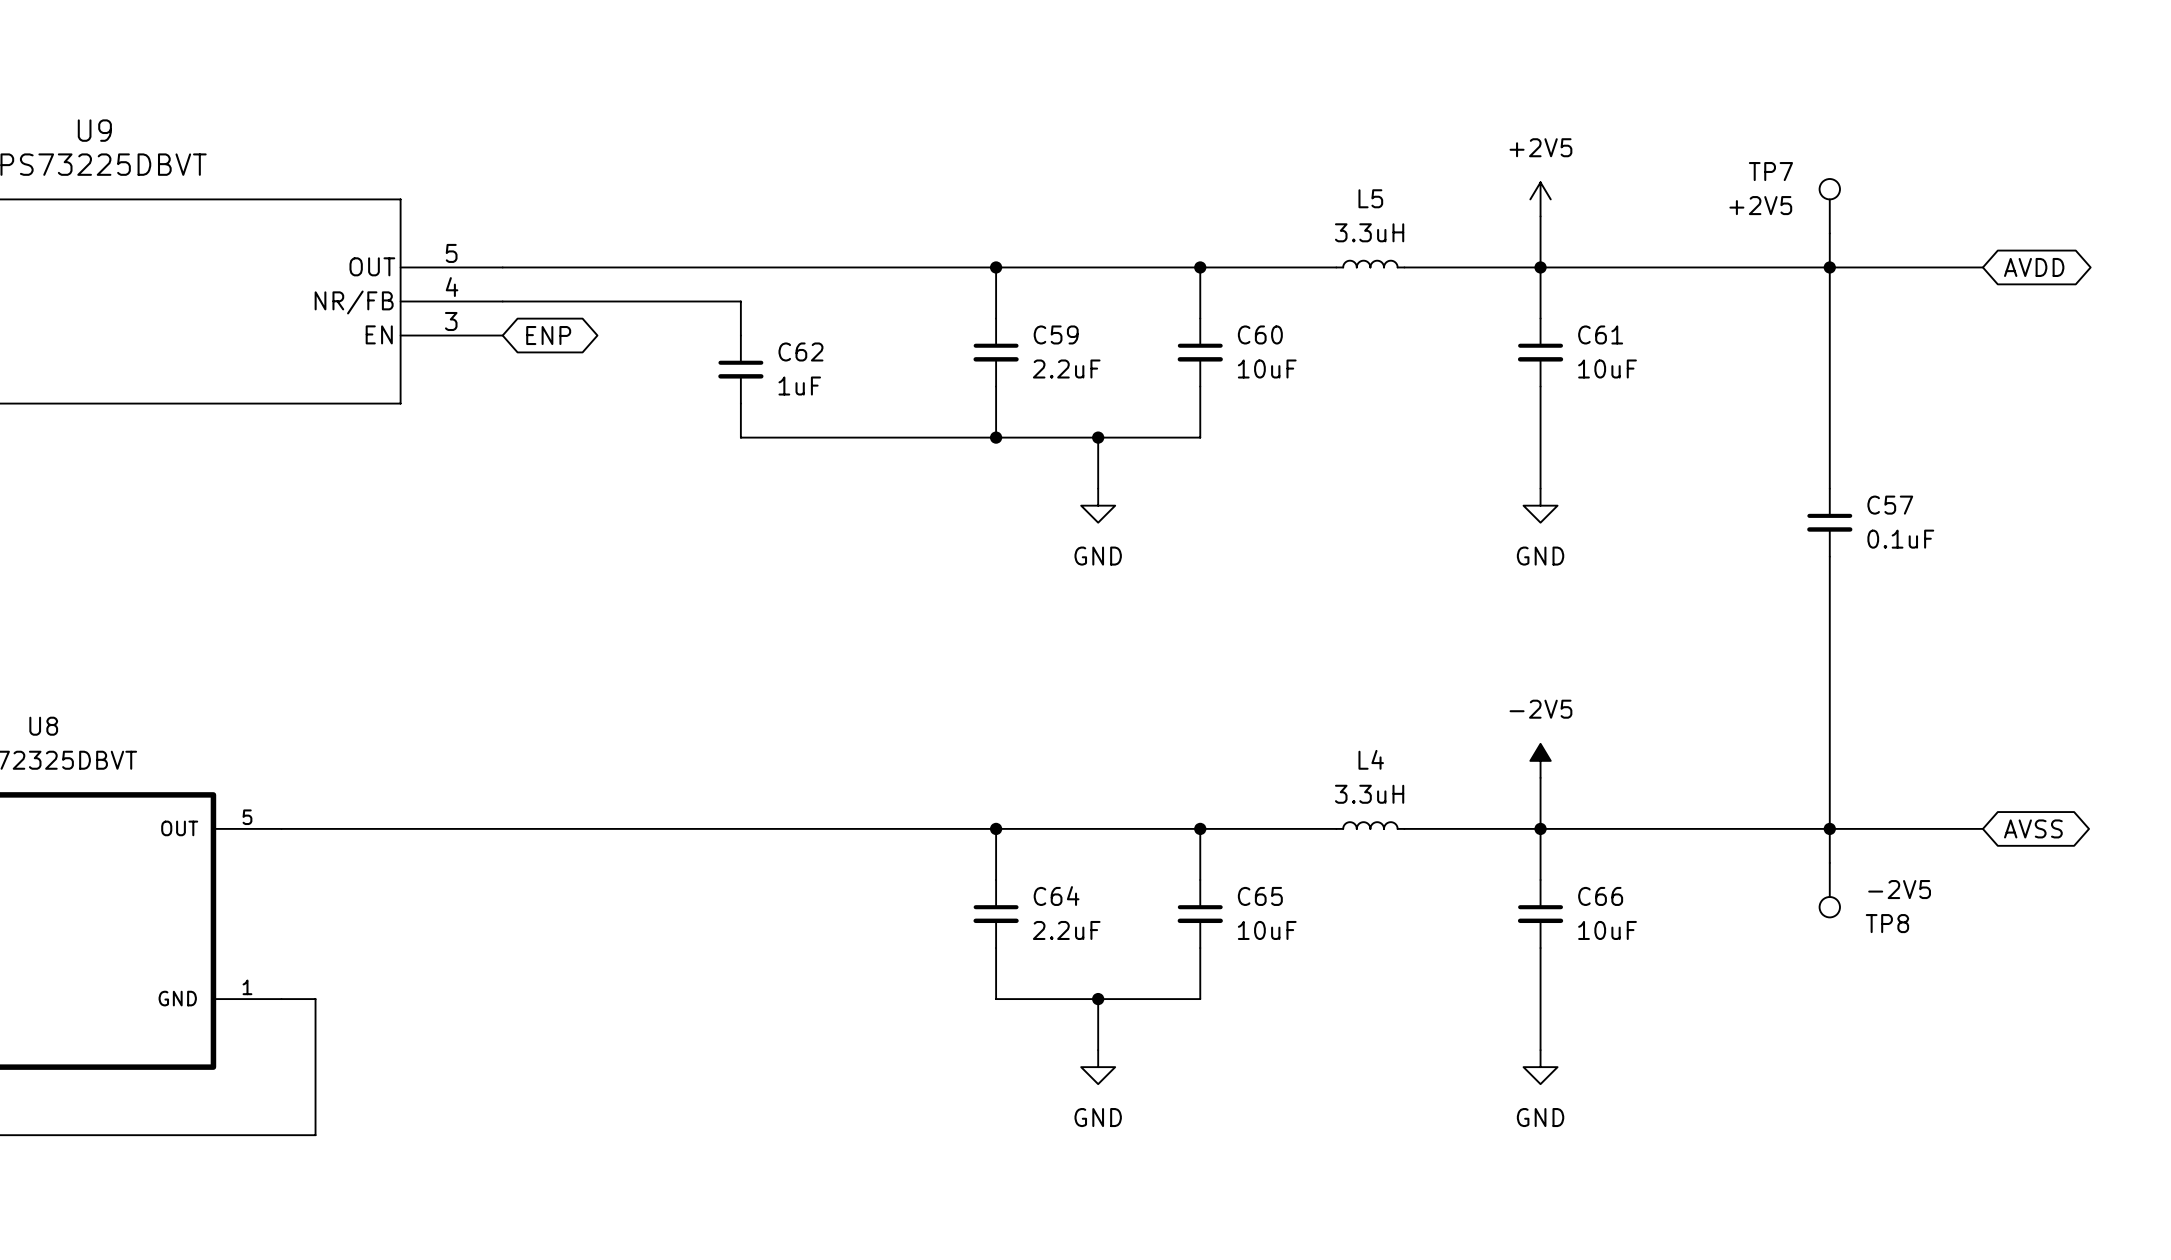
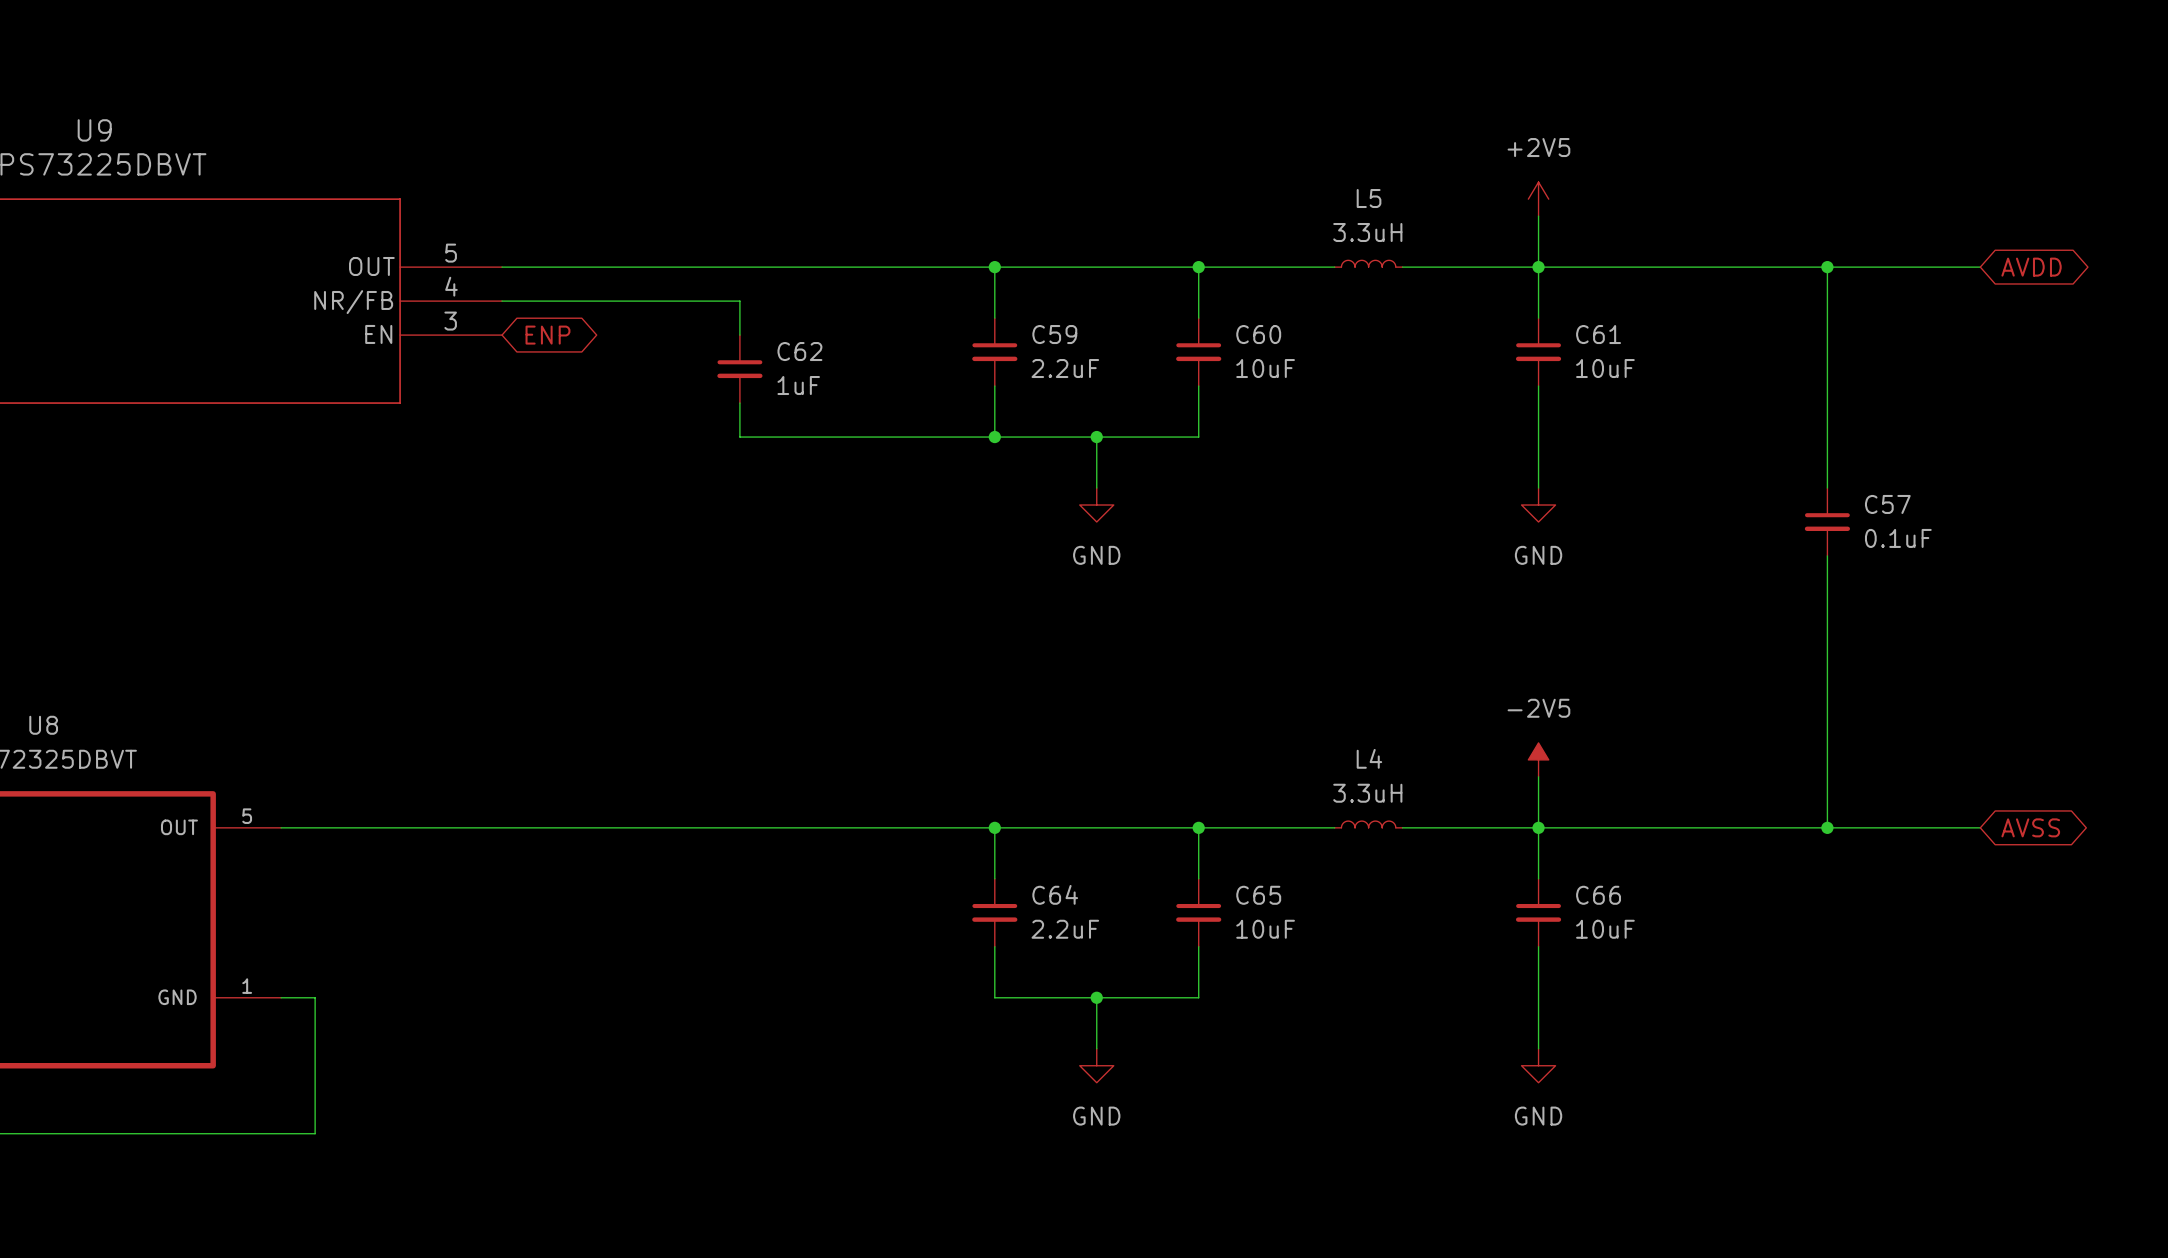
TP7: +2V5 (1829, 206) -> none
wire: (1829, 233) (1829, 267) -> none
wire: (1829, 828) (1829, 862) -> none
TP8: -2V5 (1829, 890) -> none

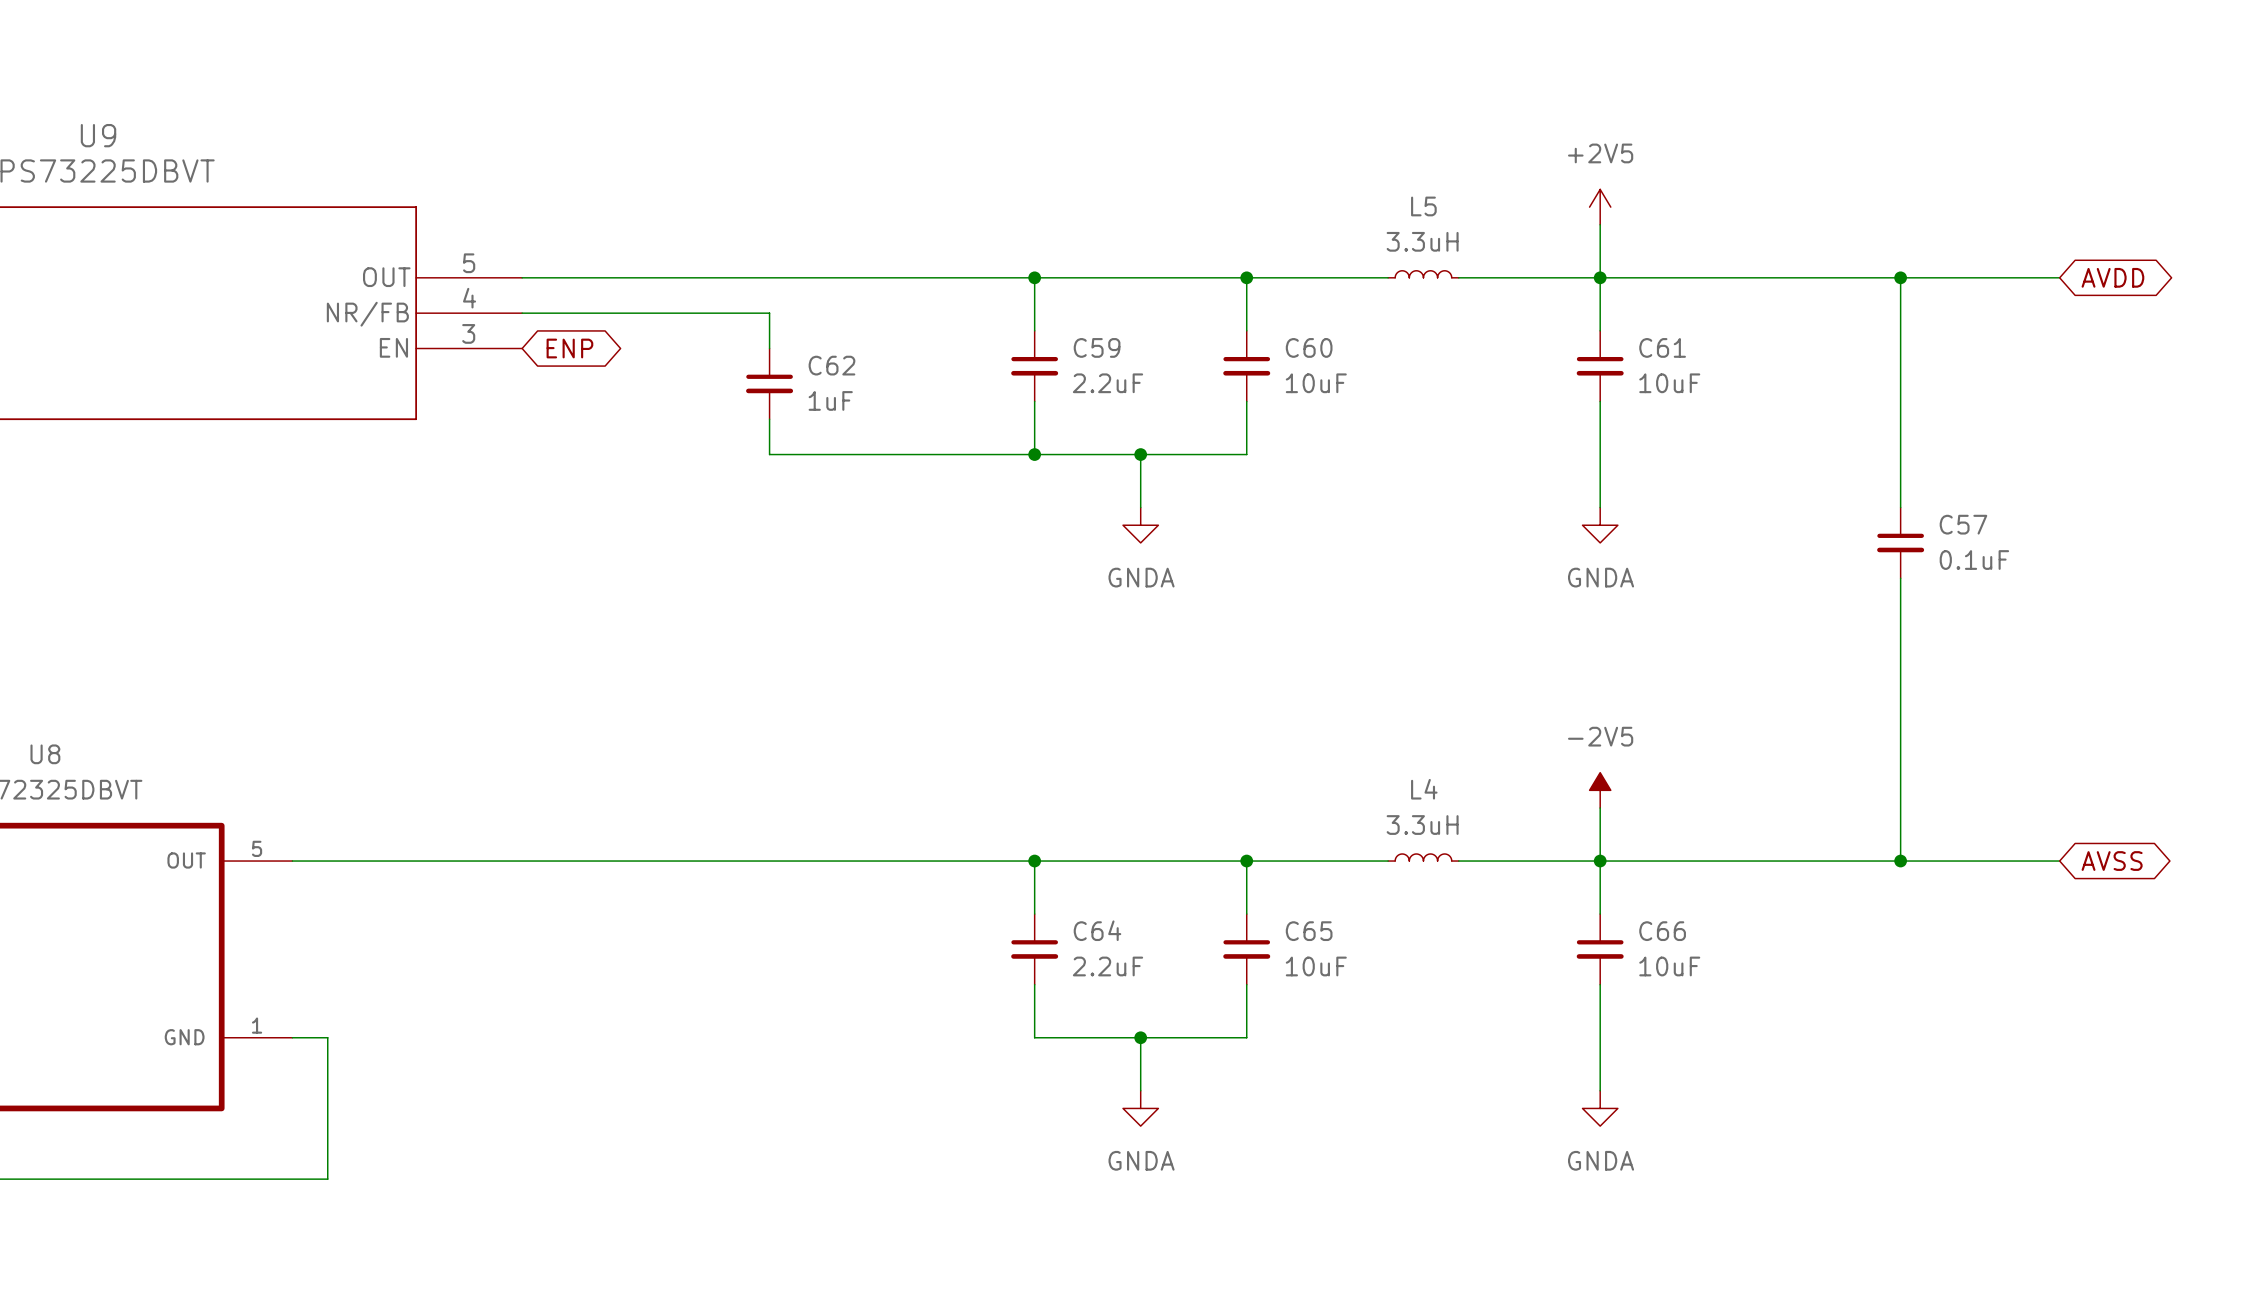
power symbol: GND (1096, 505) -> GNDA (1140, 525)
power symbol: GND (1538, 505) -> GNDA (1600, 525)
power symbol: GND (1096, 1065) -> GNDA (1140, 1108)
power symbol: GND (1538, 1065) -> GNDA (1600, 1108)

